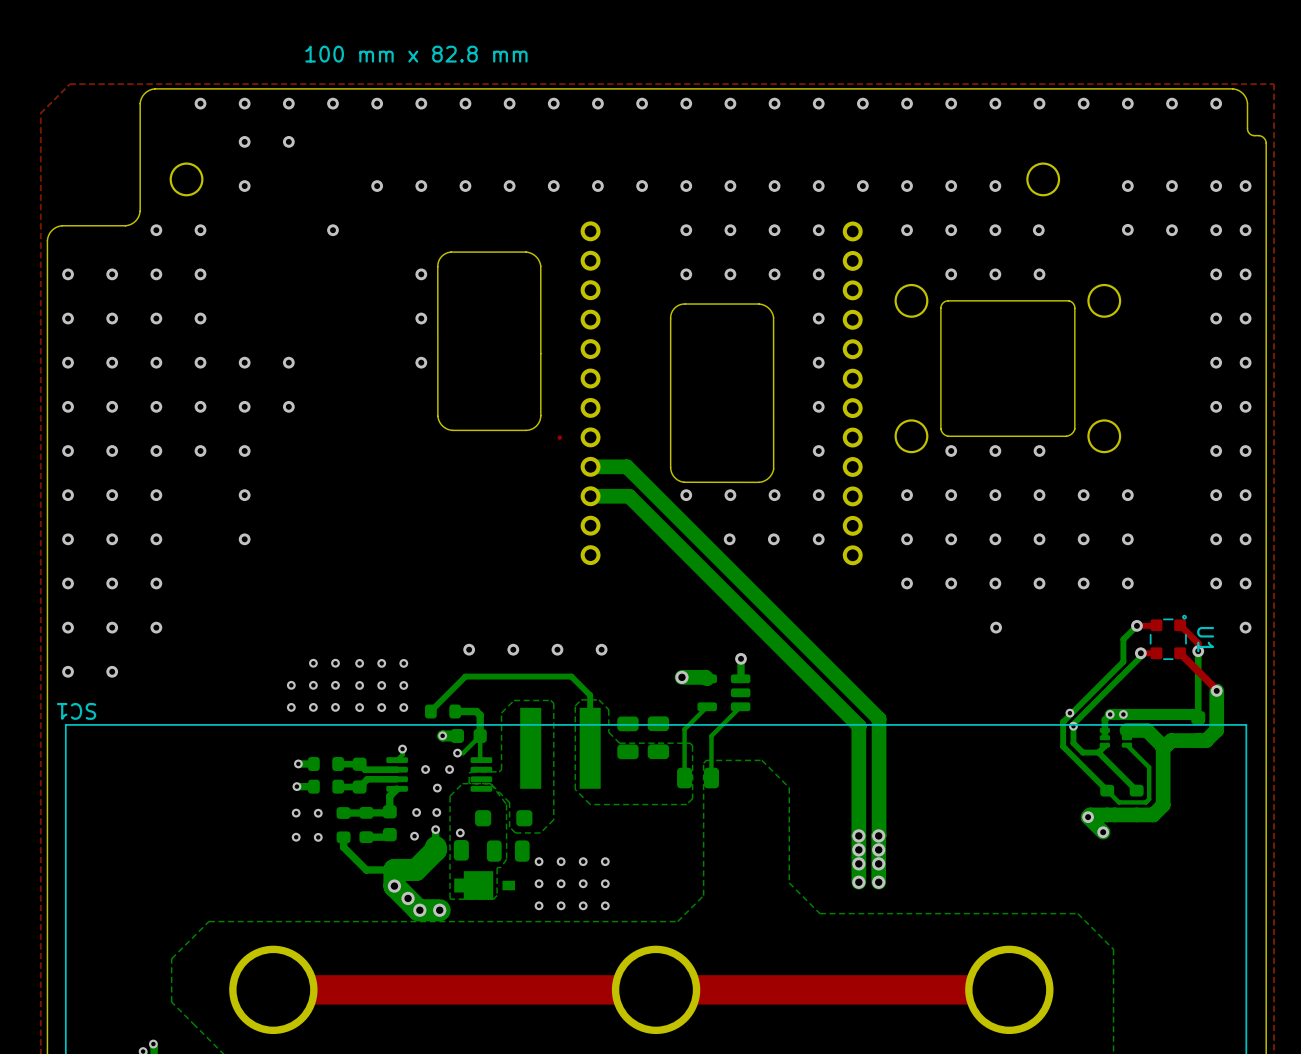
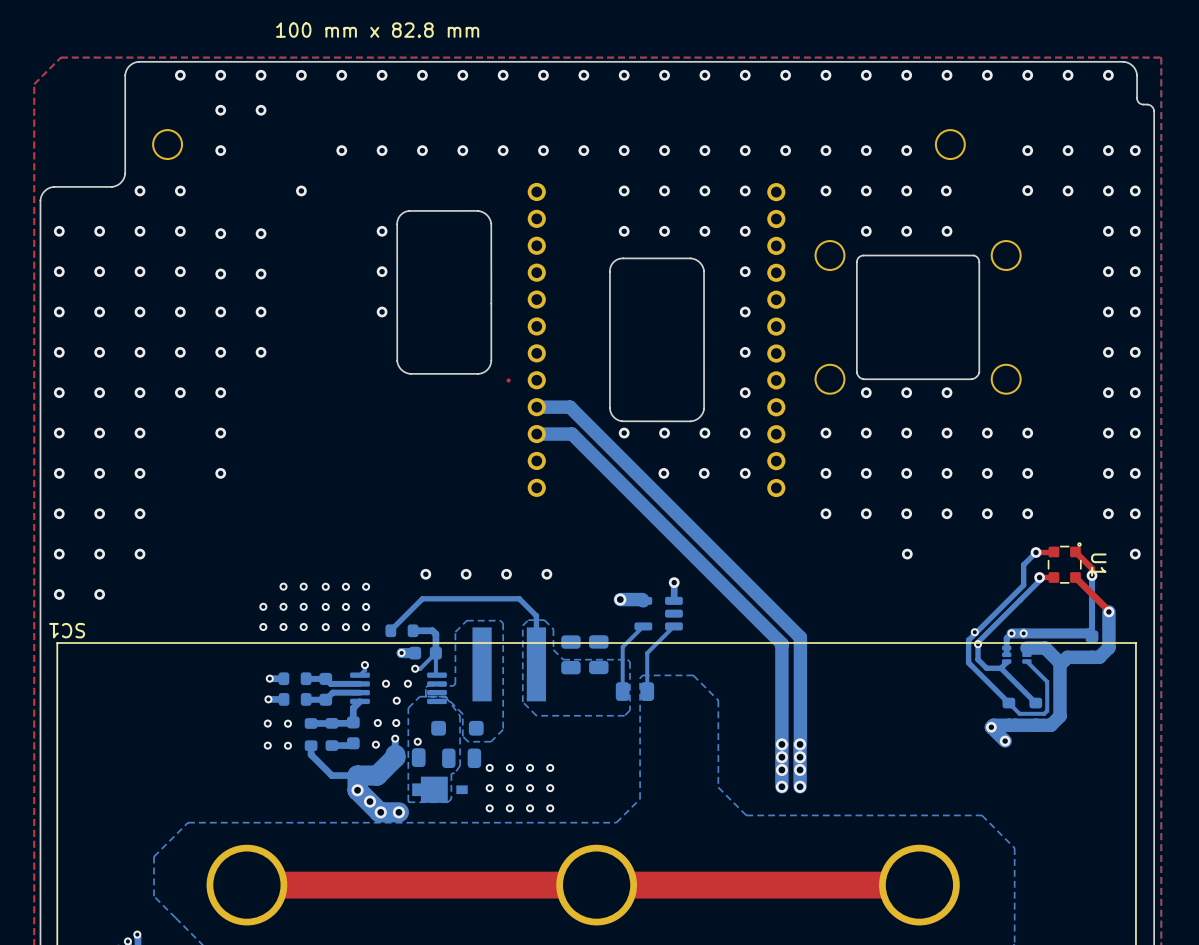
via: none -> (220, 233)
via: none -> (261, 233)
via: none -> (220, 274)
via: none -> (261, 274)

